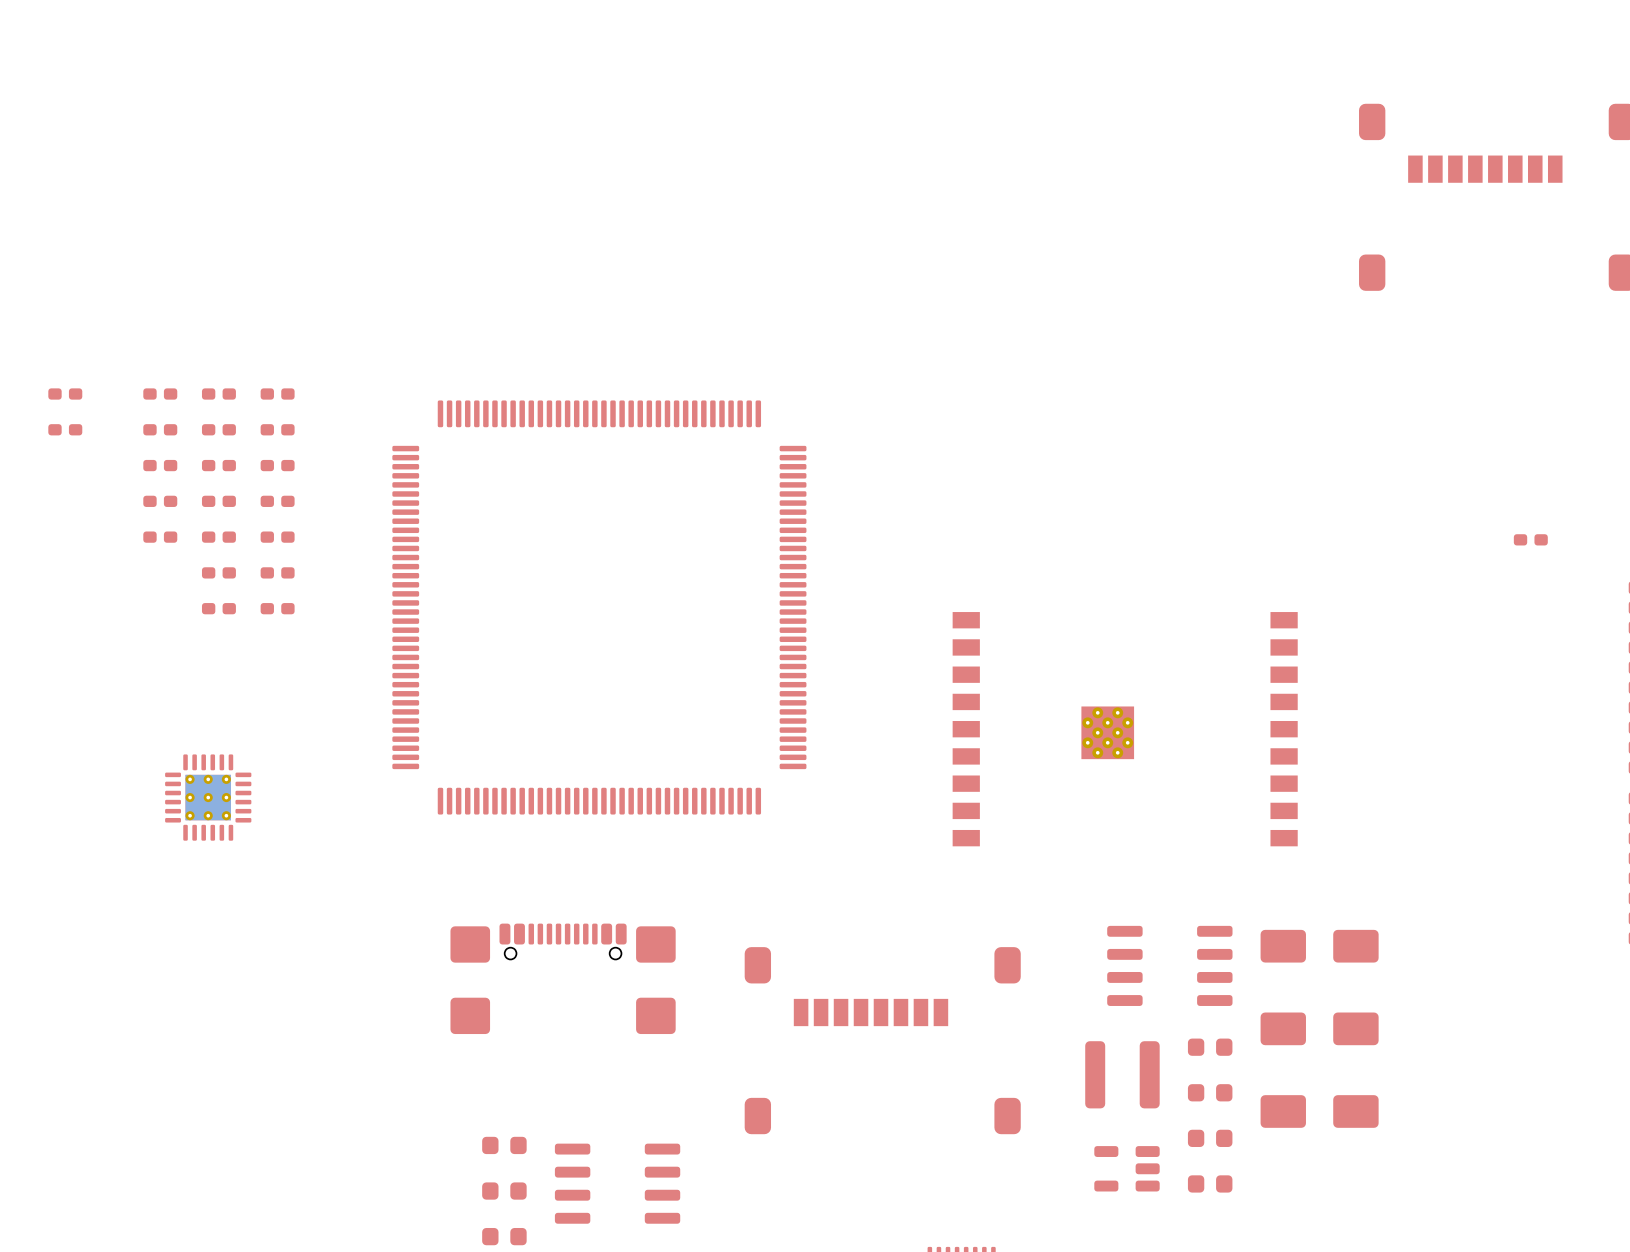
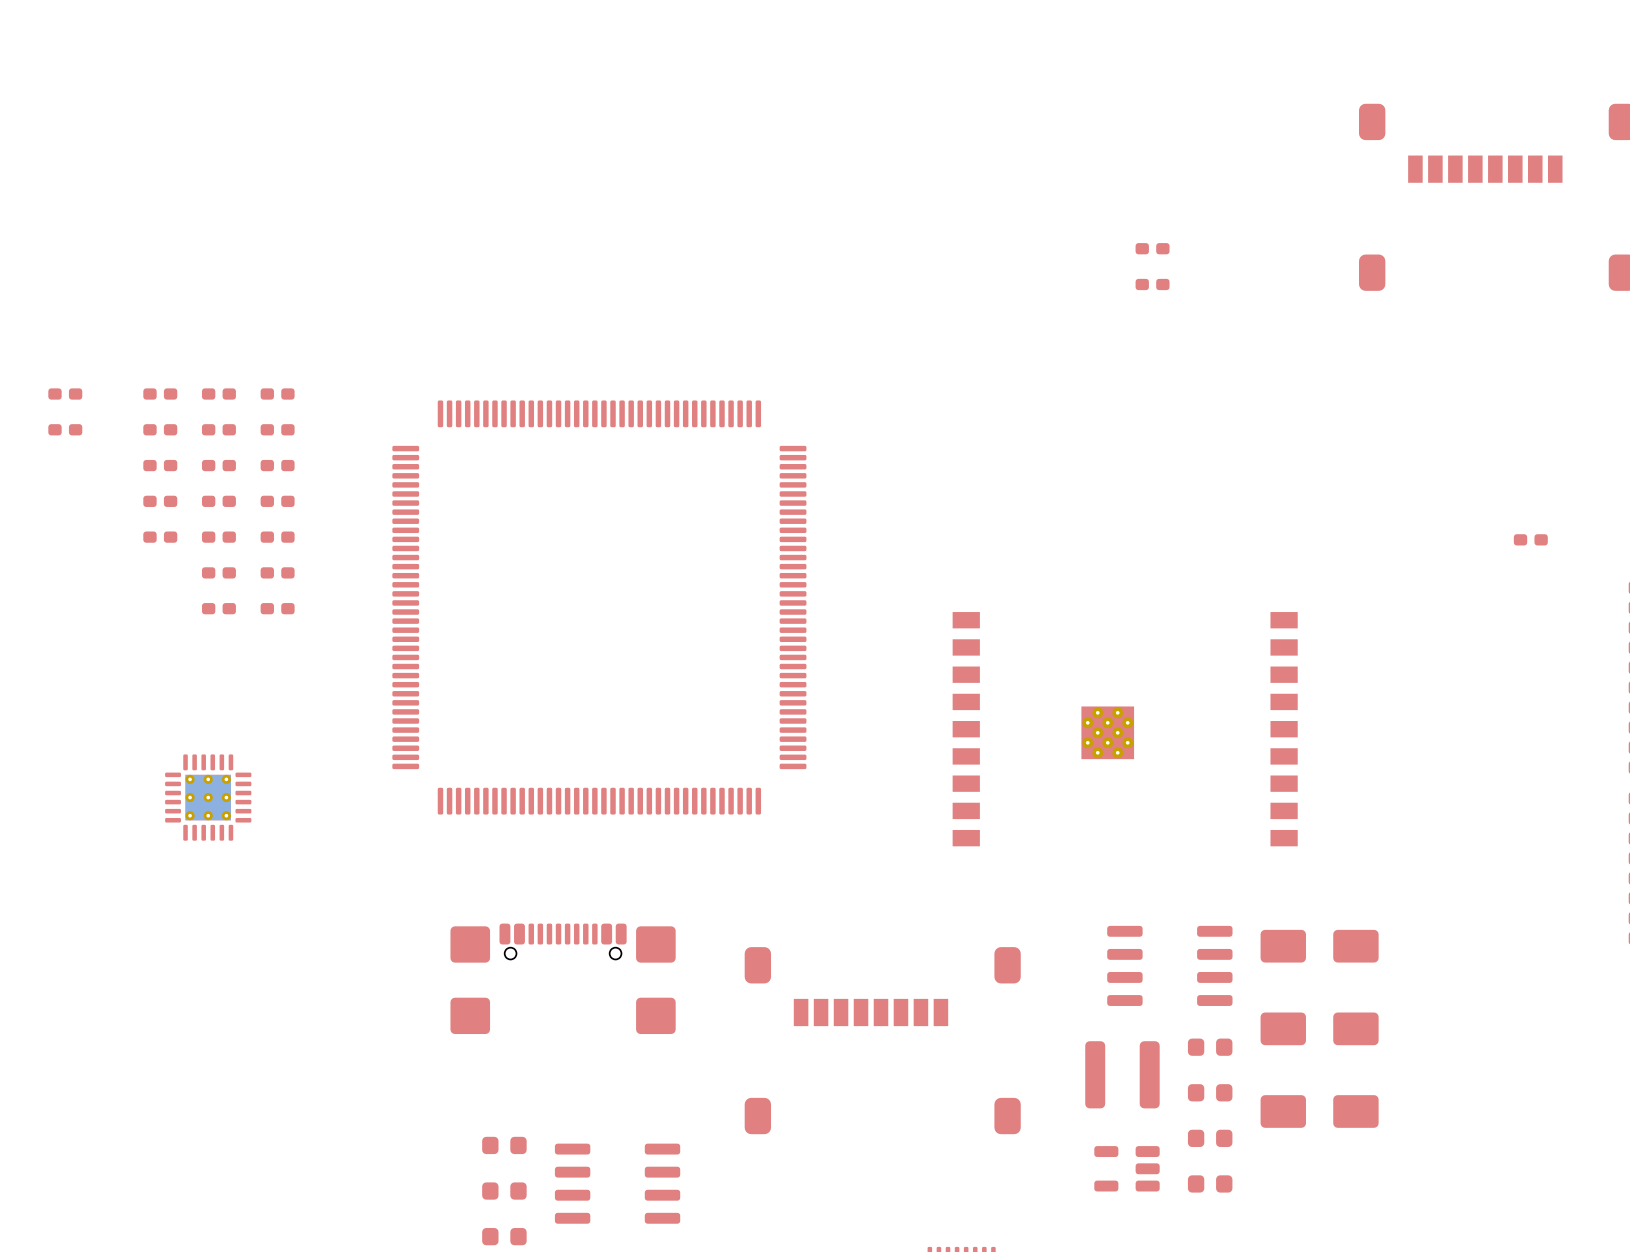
part: none -> (1152, 248)
part: none -> (1152, 284)

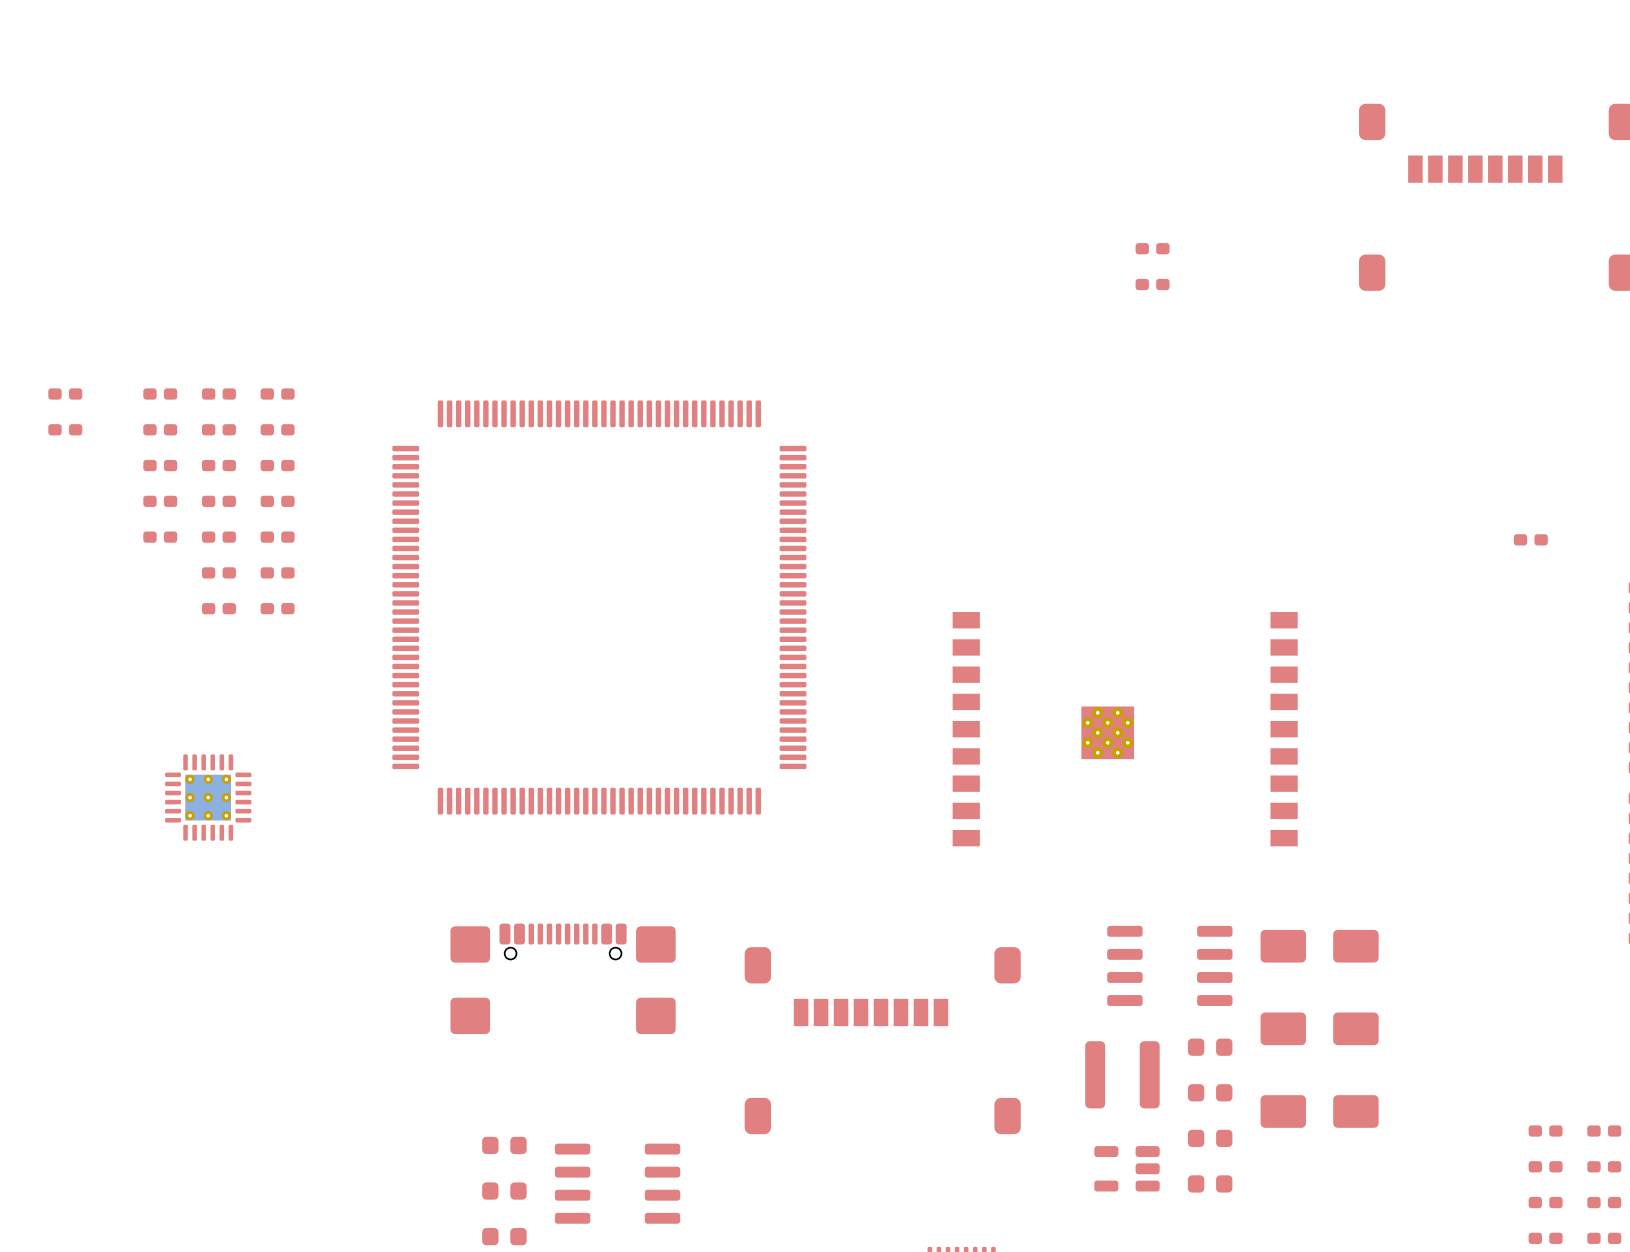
part: none -> (1545, 1131)
part: none -> (1604, 1131)
part: none -> (1545, 1166)
part: none -> (1604, 1166)
part: none -> (1545, 1202)
part: none -> (1604, 1202)
part: none -> (1545, 1238)
part: none -> (1604, 1238)

